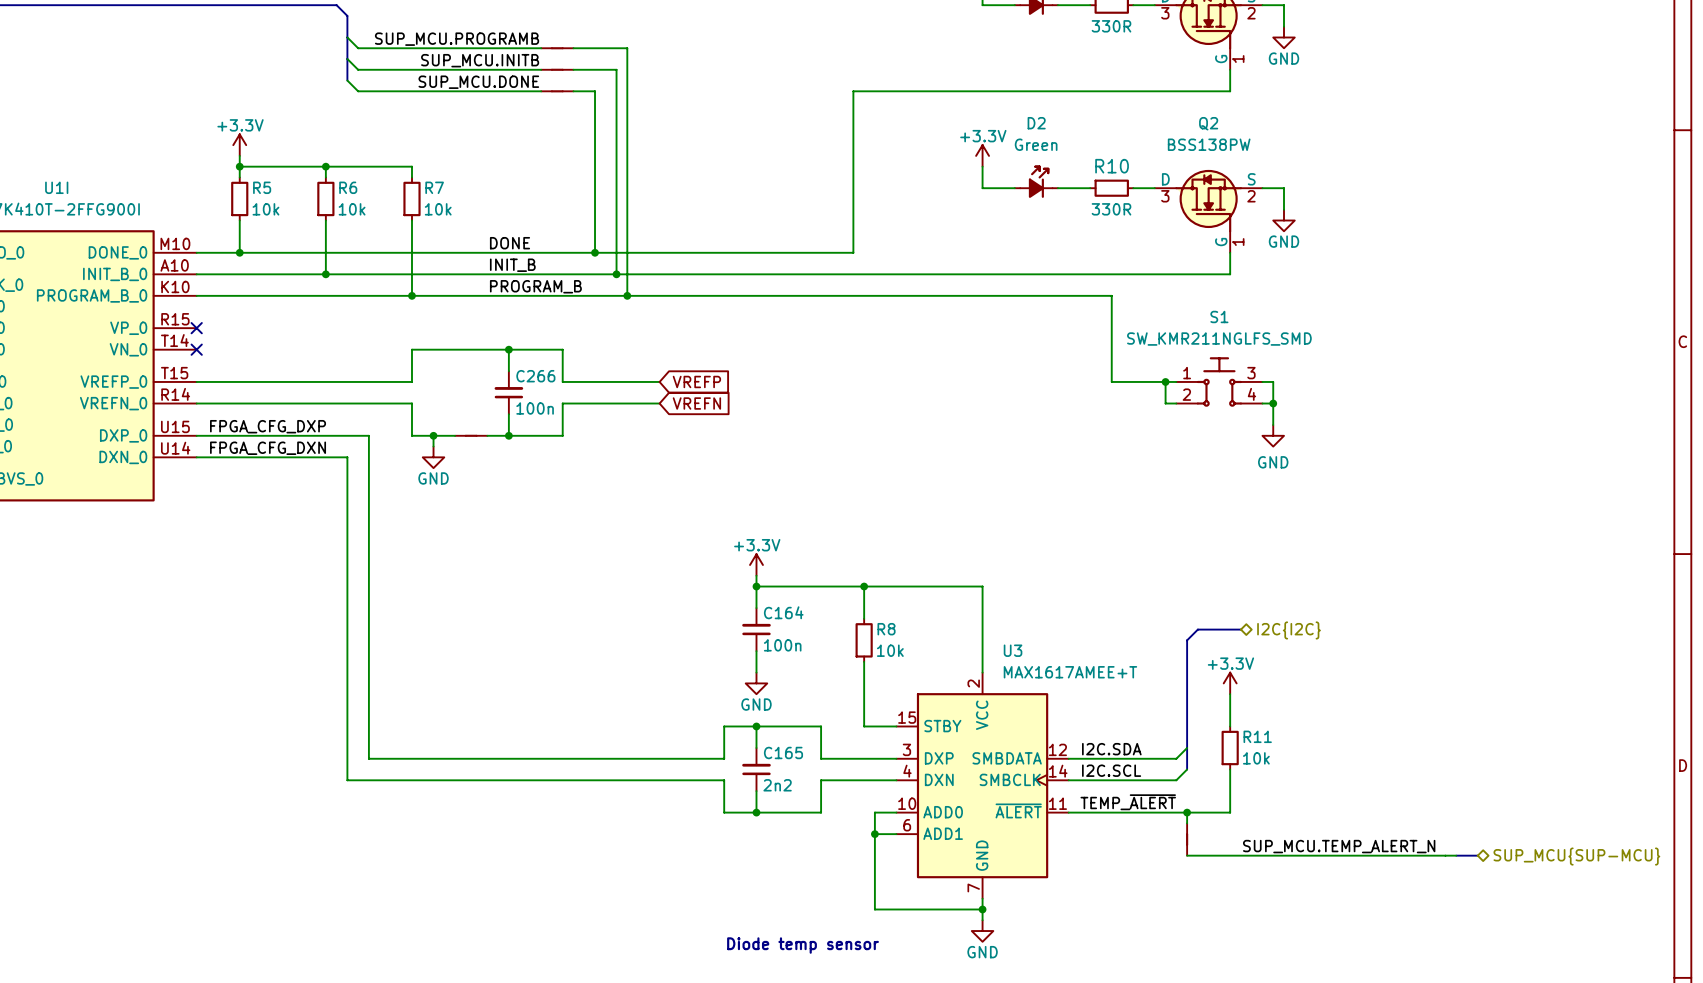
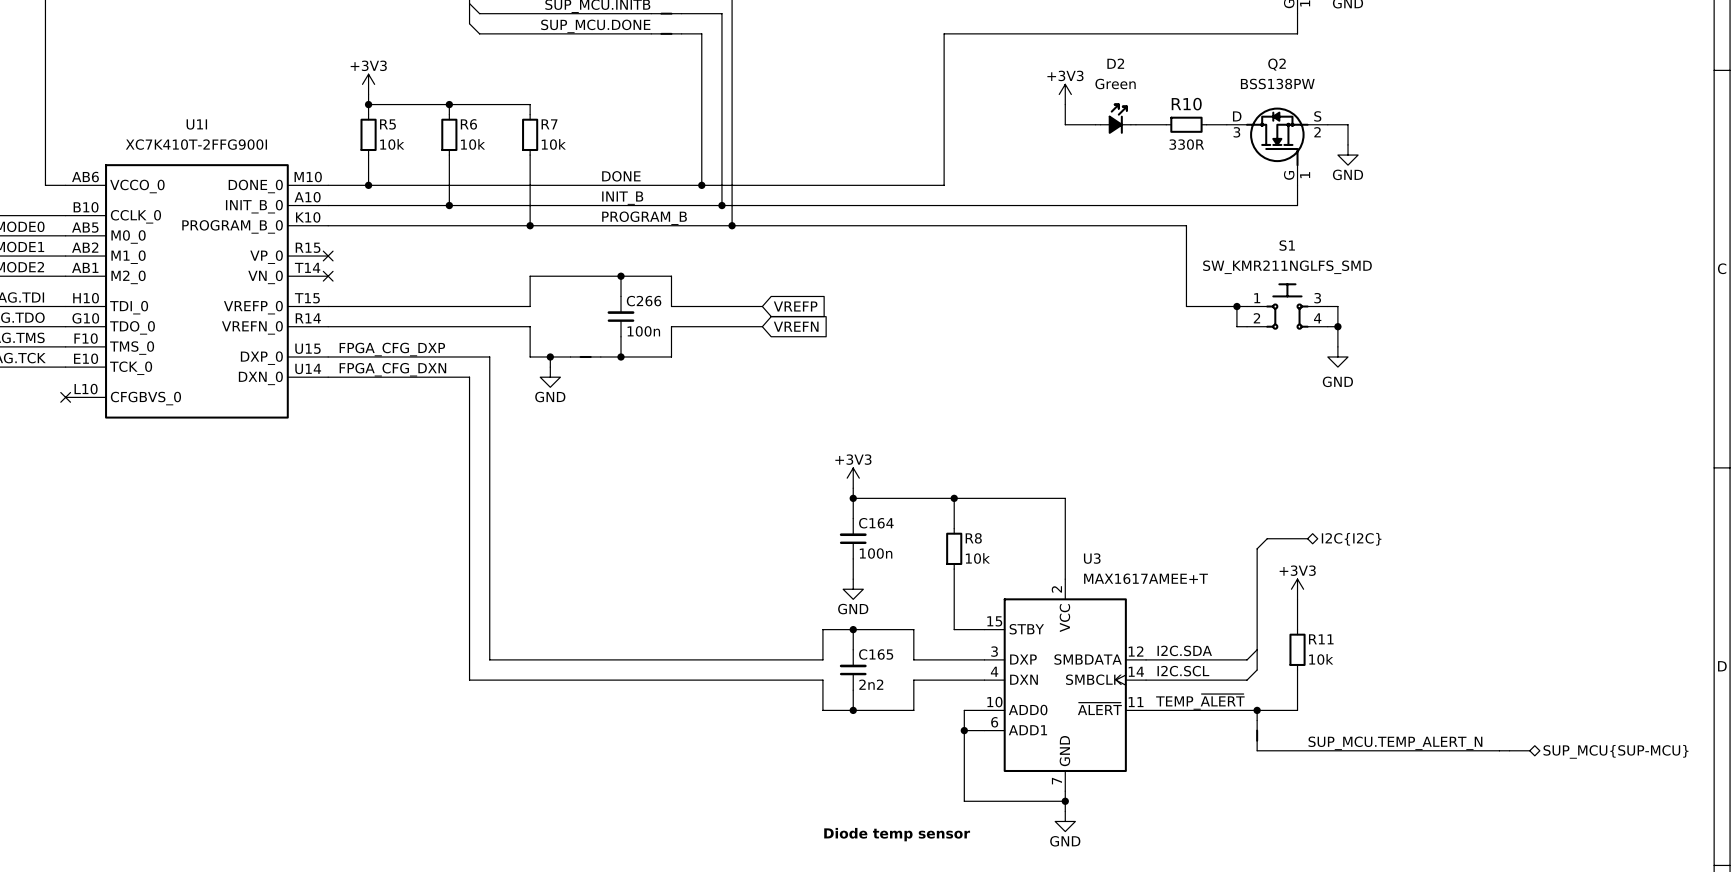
power symbol: +3.3V (239, 145) -> +3V3 (368, 84)
power symbol: +3.3V (982, 155) -> +3V3 (1065, 94)
power symbol: +3.3V (756, 564) -> +3V3 (853, 478)
power symbol: +3.3V (1230, 683) -> +3V3 (1297, 589)

